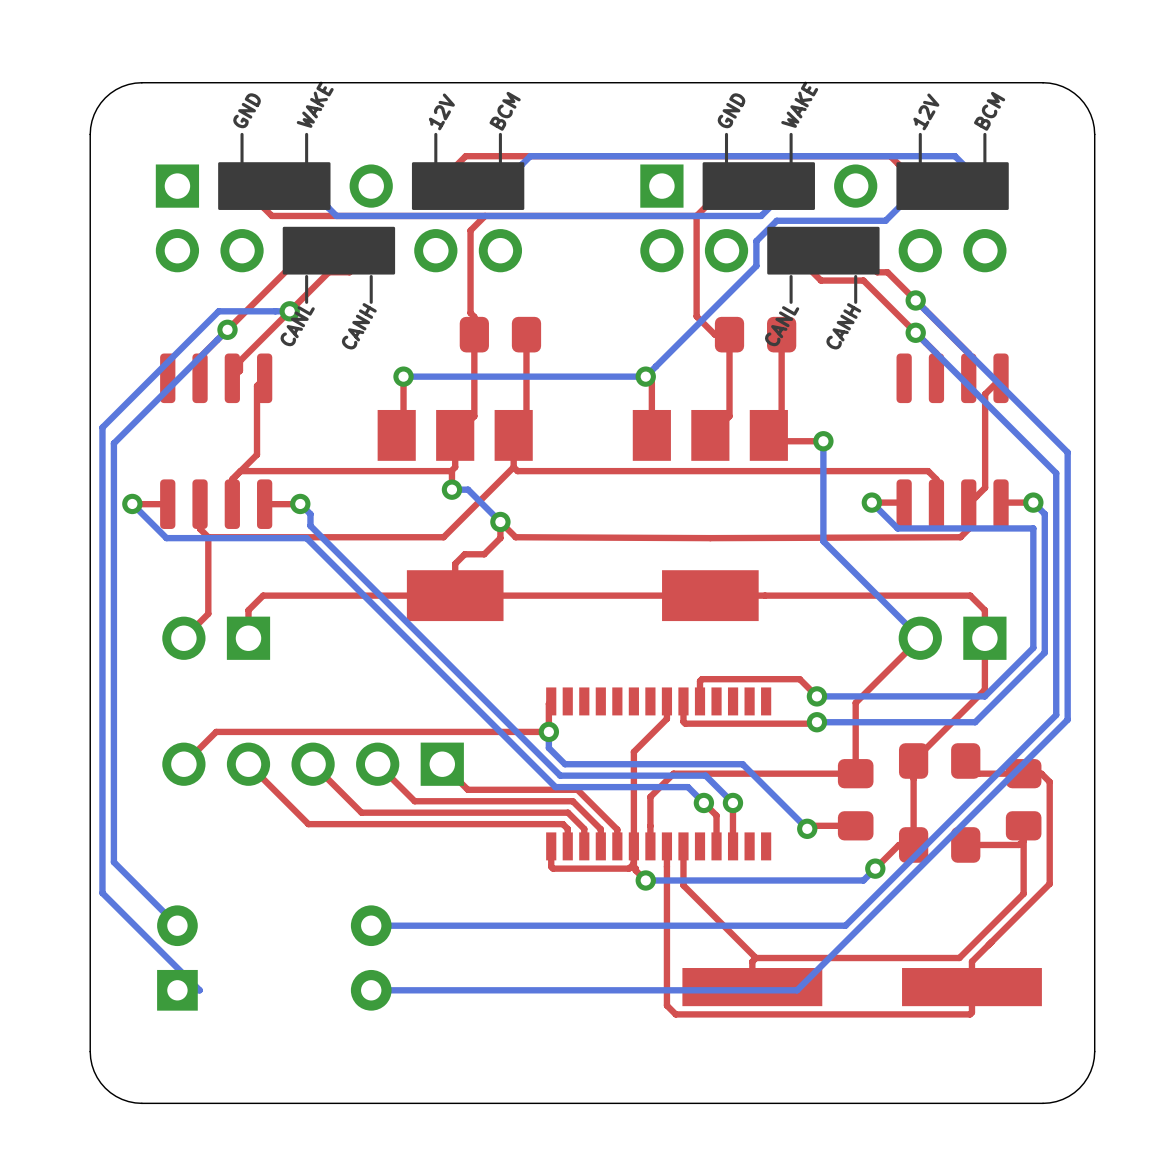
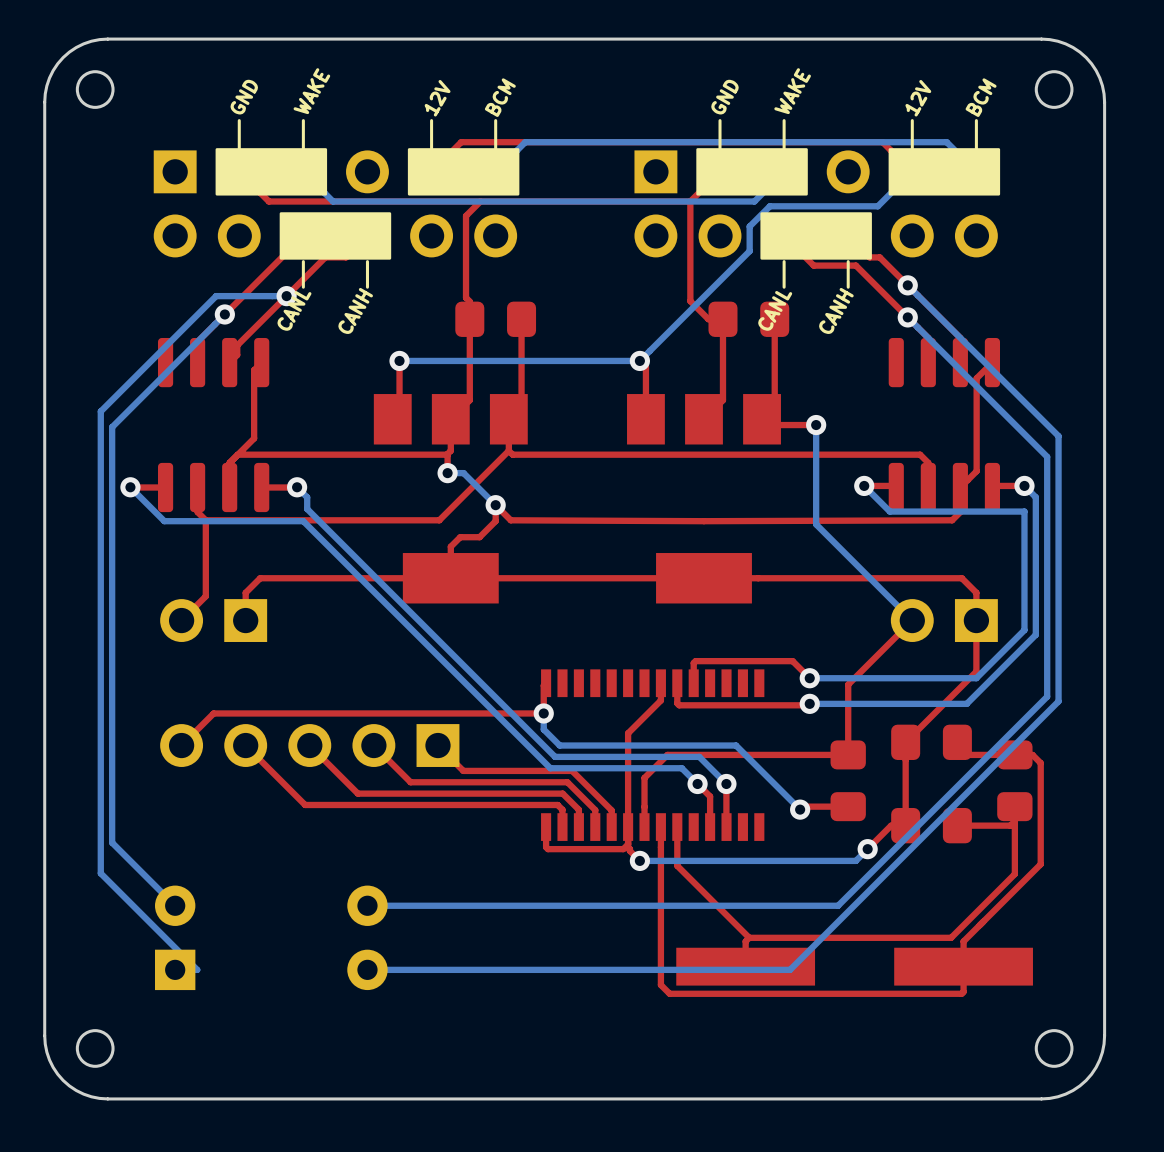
board edge: (1043, 82) (141, 82) (122, 86) (105, 97) (94, 114) (90, 134) (90, 1051) (94, 1071) (105, 1088) (122, 1099) (141, 1103) (1043, 1103) (1062, 1099) (1079, 1088) (1090, 1071) (1094, 1051) (1094, 134) (1090, 114) (1079, 97) (1062, 86) (1043, 82) -> (1041, 39) (1065, 43) (1086, 57) (1099, 78) (1104, 102) (1104, 1035) (1099, 1060) (1086, 1080) (1065, 1094) (1041, 1098) (107, 1098) (83, 1094) (63, 1080) (49, 1060) (44, 1035) (44, 102) (49, 78) (63, 57) (83, 43) (107, 39) (1041, 39)
round board edge: none -> [75, 70, 115, 109]
round board edge: none -> [1034, 70, 1074, 109]
round board edge: none -> [75, 1029, 115, 1068]
round board edge: none -> [1034, 1029, 1074, 1068]

